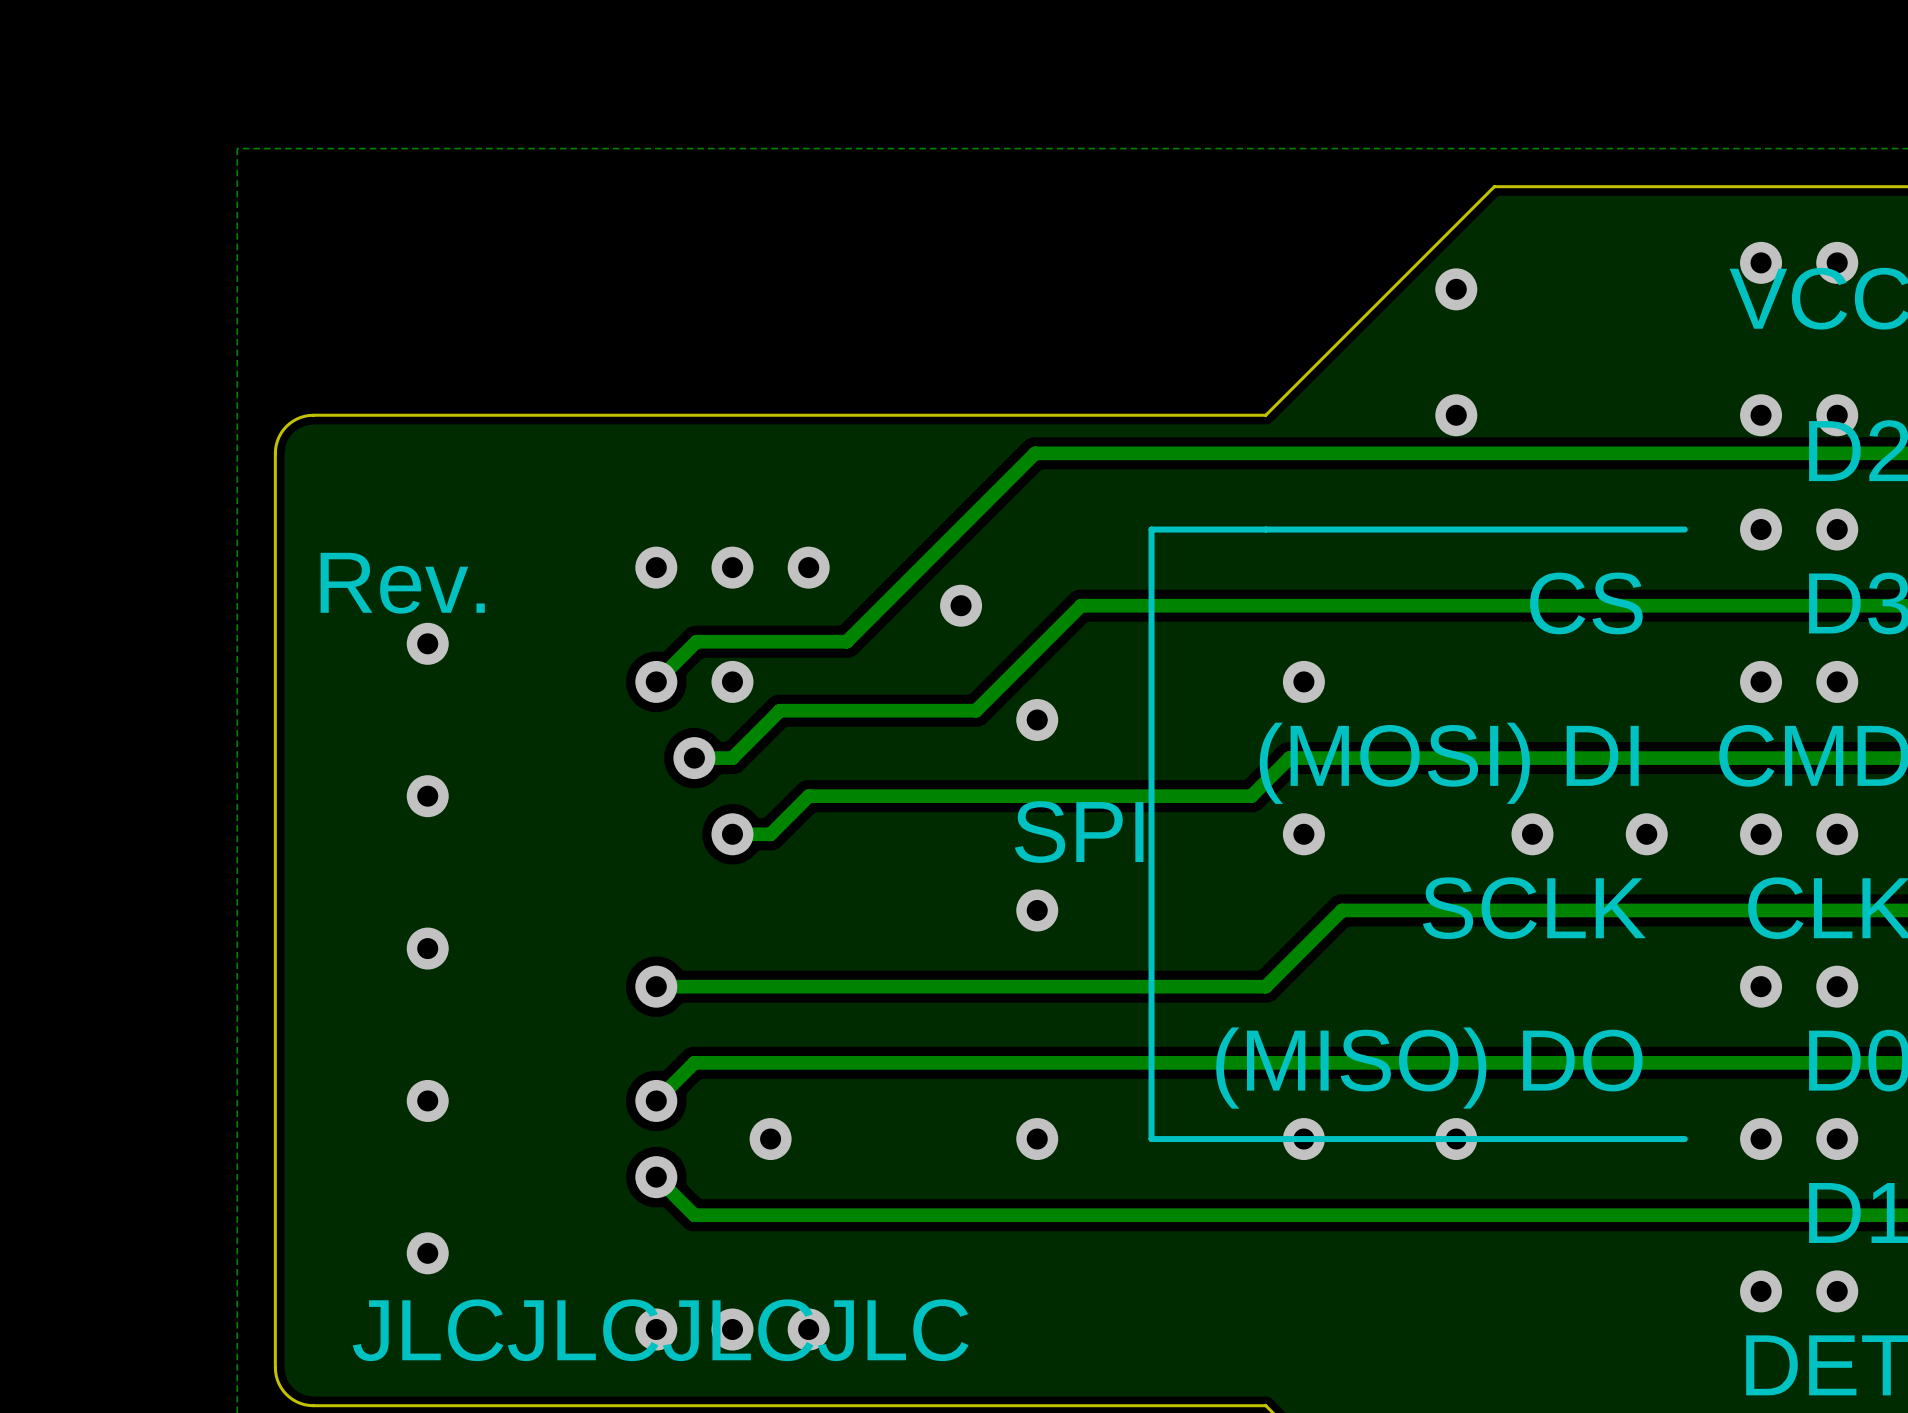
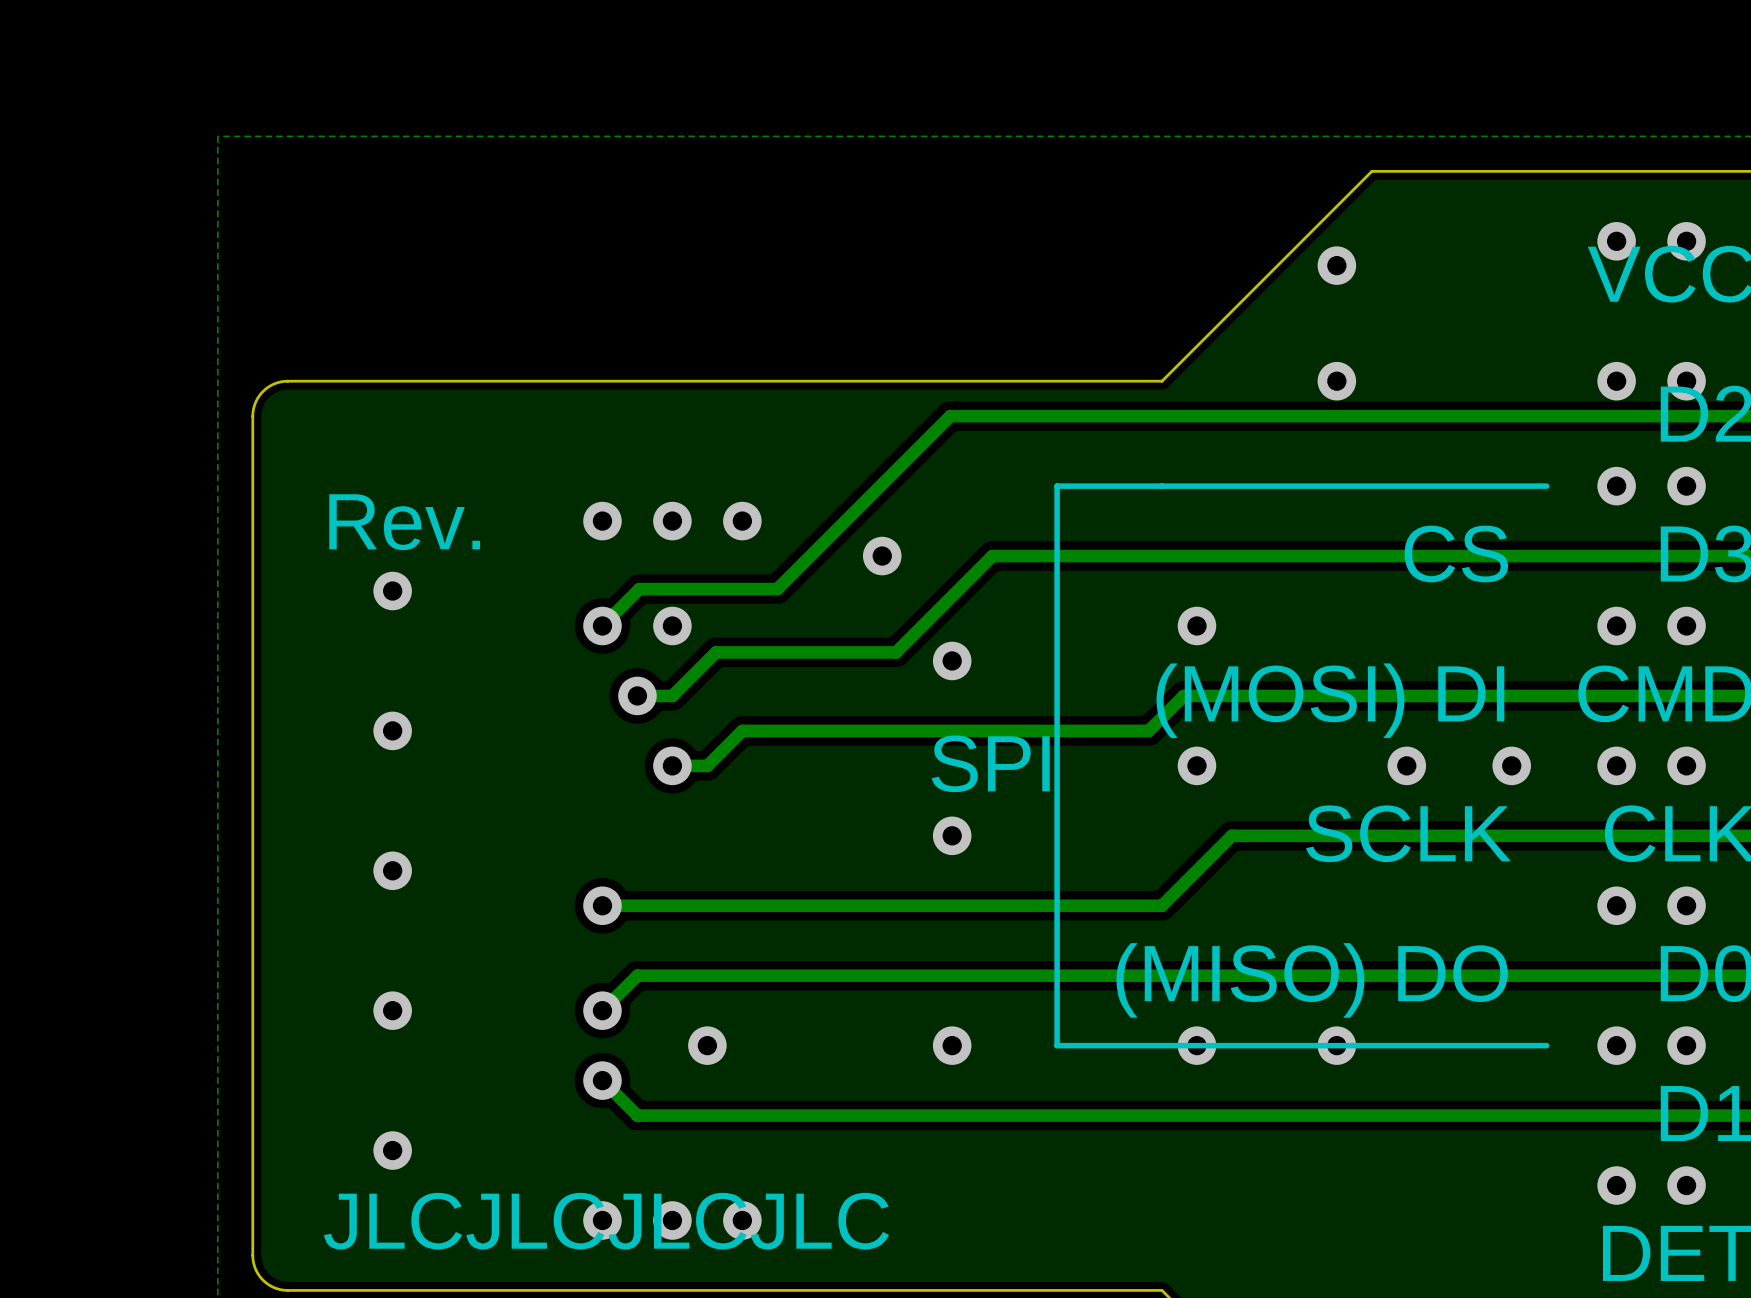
text position: Rev. (402, 583) -> Rev. (404, 522)

